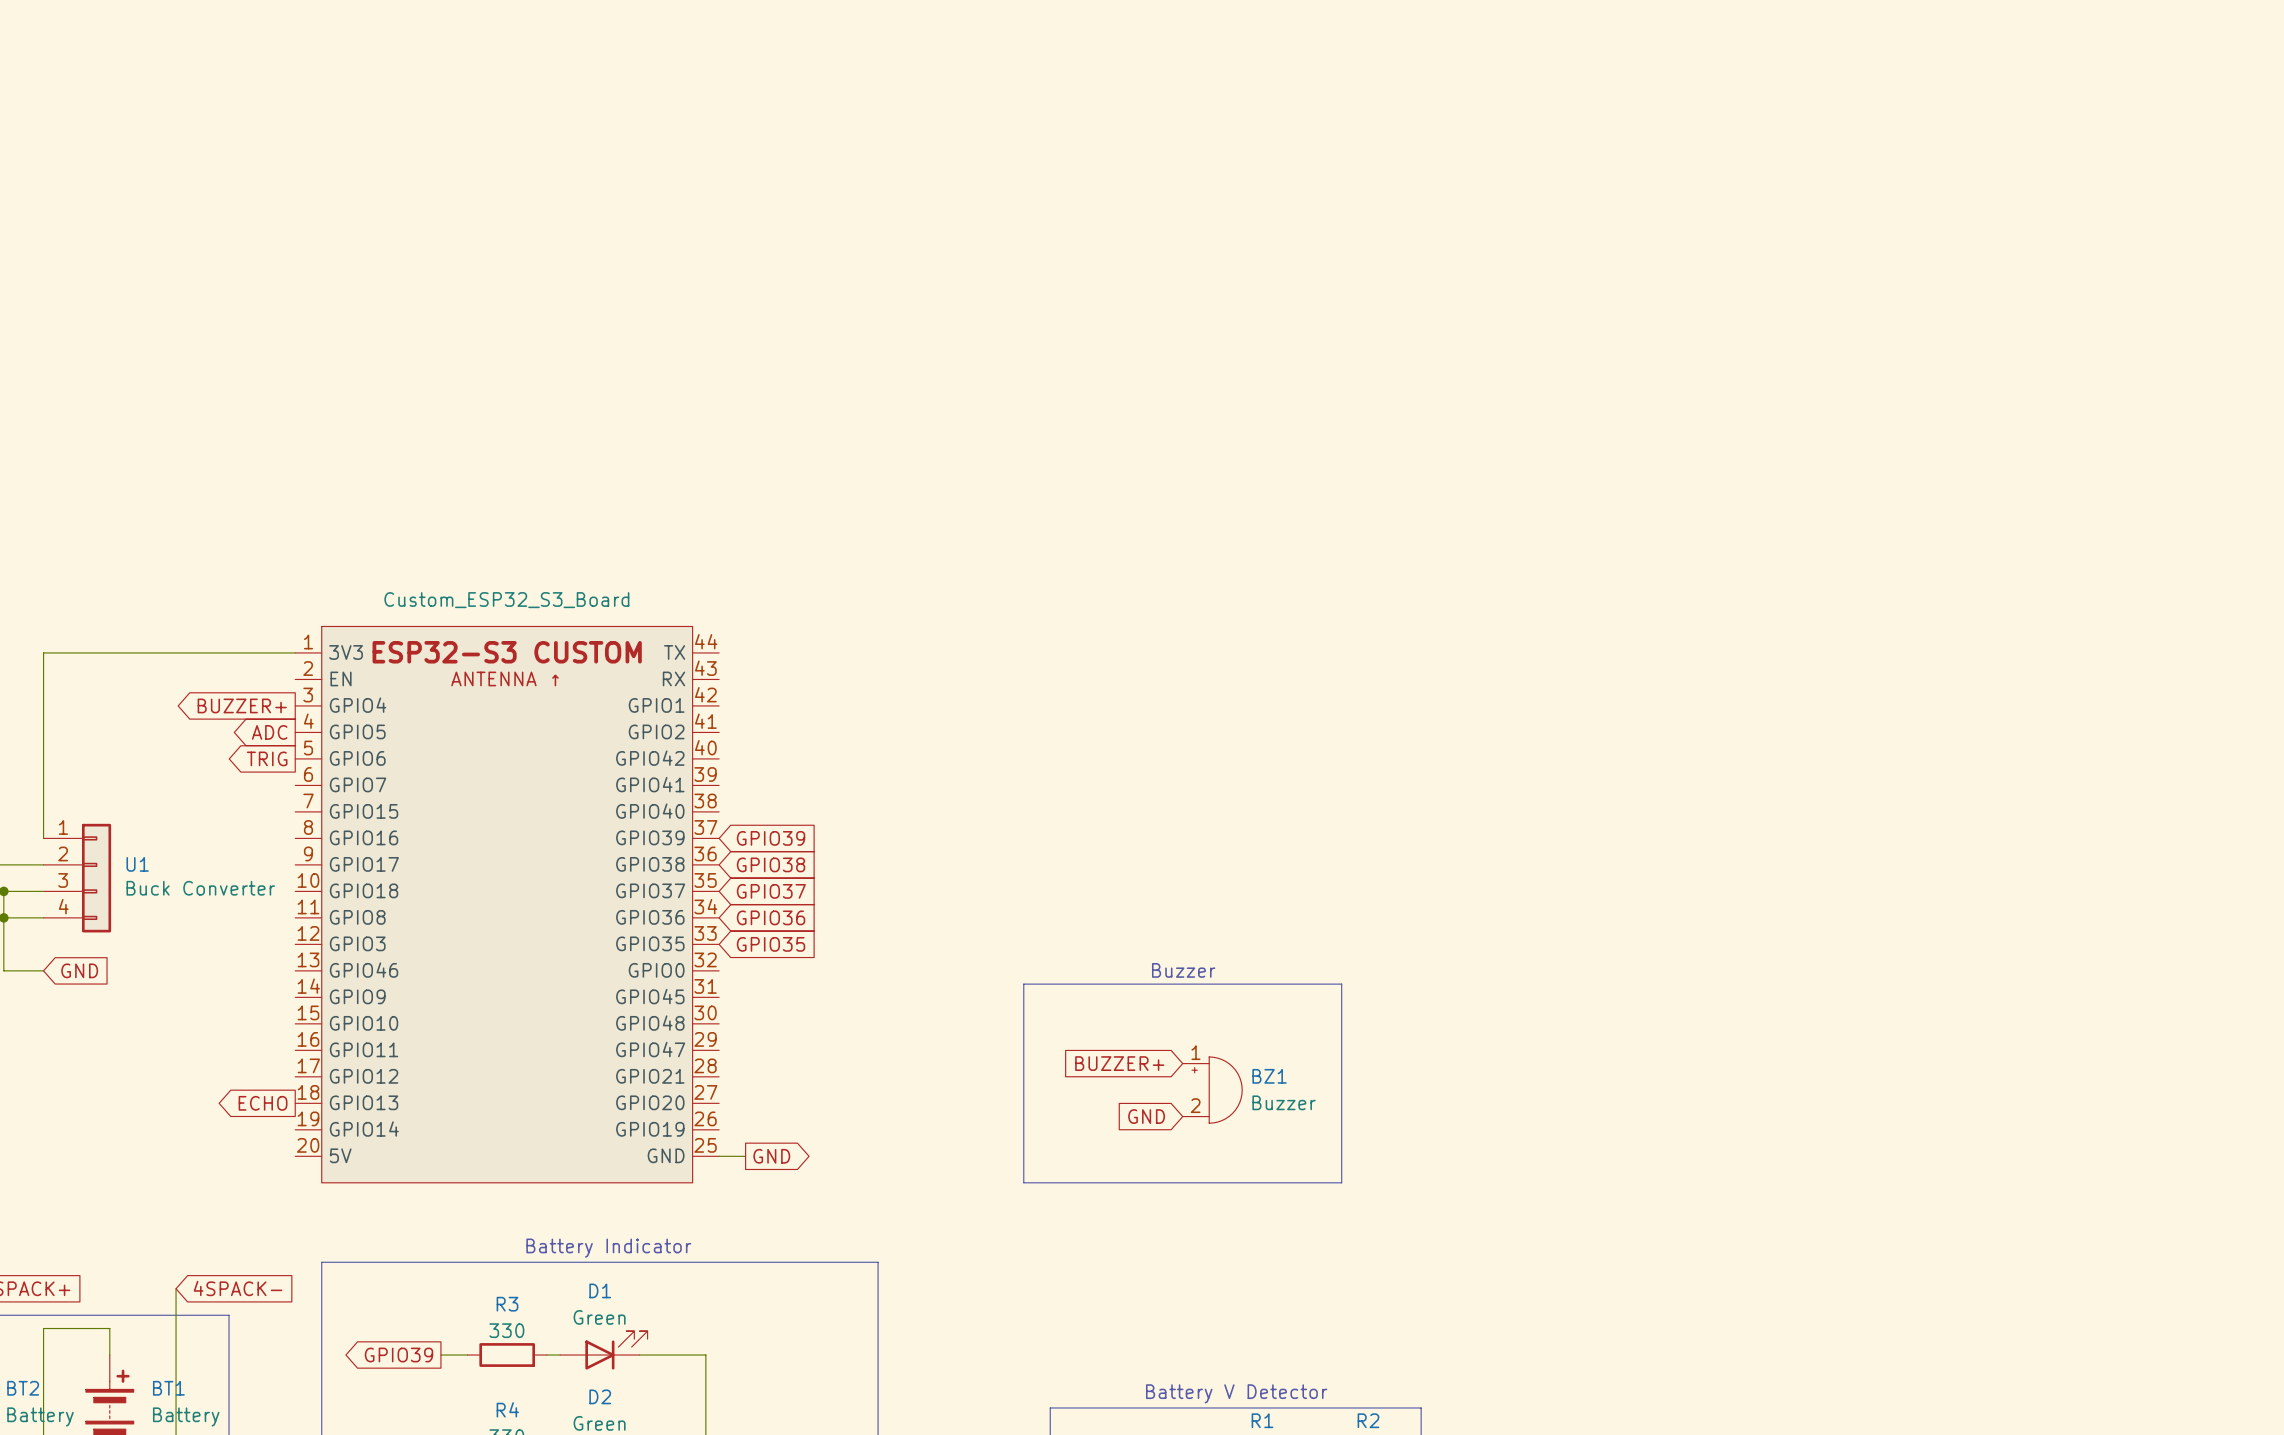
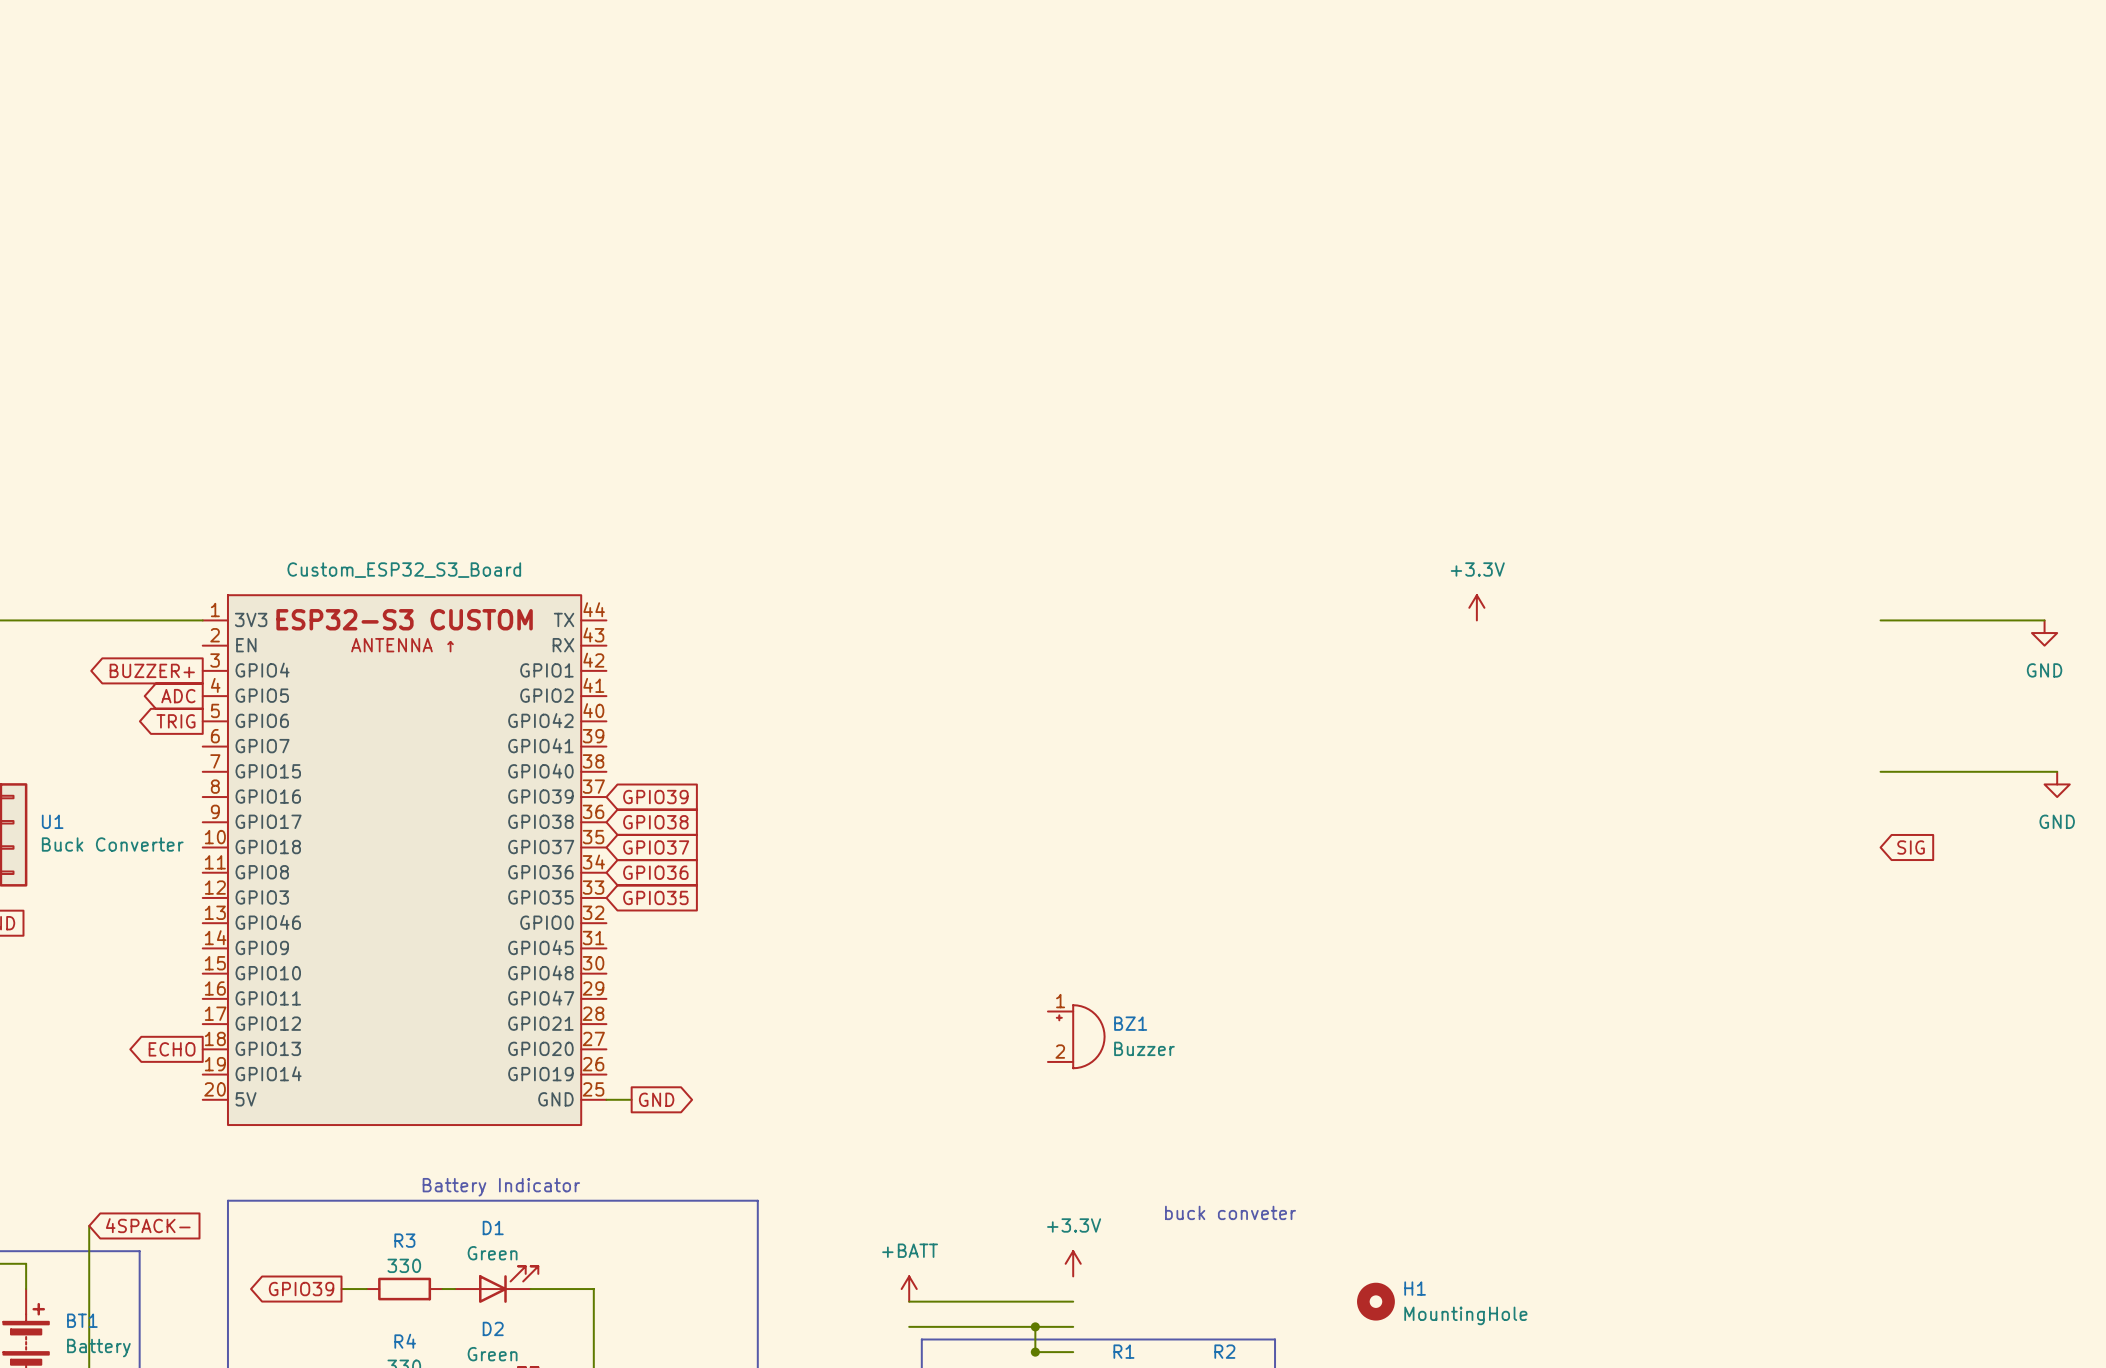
power symbol: none -> +3.3V (1476, 607)
wire: none -> (1880, 620) (2044, 620)
power symbol: none -> GND (2044, 633)
wire: none -> (1880, 771) (2057, 771)
power symbol: none -> GND (2057, 784)
global label: none -> SIG (1911, 847)
text: Buzzer (1183, 970) -> none
line: (1023, 984) (1341, 984) (1341, 1182) (1023, 1182) (1023, 984) -> none
global label: BUZZER+ (1119, 1063) -> none
global label: GND (1146, 1116) -> none
text: none -> buck conveter (1230, 1212)
power symbol: none -> +3.3V (1073, 1263)
power symbol: none -> +BATT (909, 1289)
wire: none -> (909, 1301) (1073, 1301)
H1: none -> MountingHole (1375, 1301)
text: Battery V Detector (1236, 1393) -> none
wire: none -> (909, 1326) (1073, 1326)
wire: none -> (1035, 1326) (1035, 1352) (1073, 1352)
junction: none -> (1035, 1326)
junction: none -> (1035, 1352)

